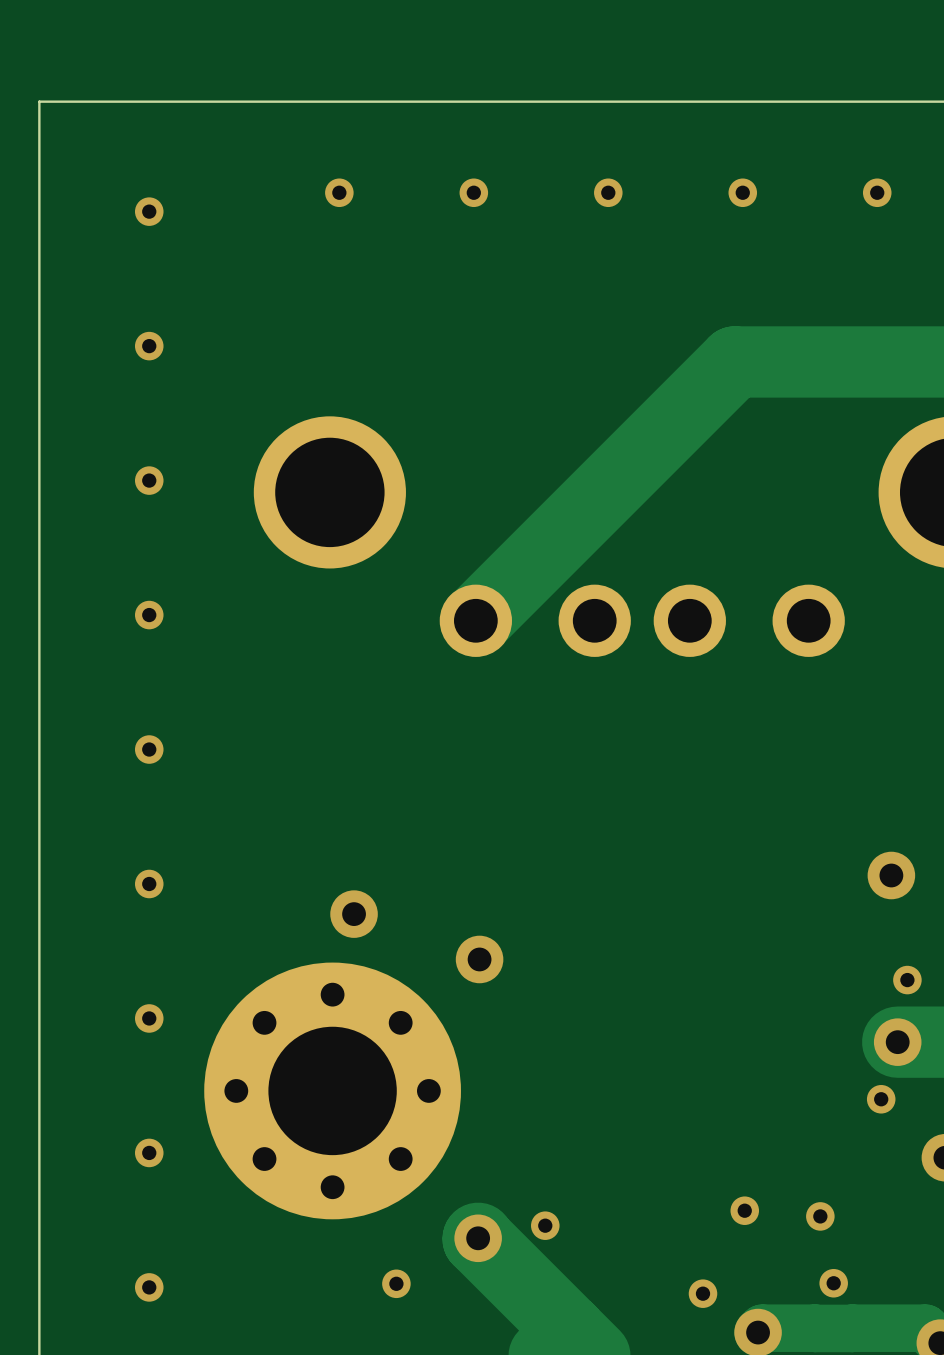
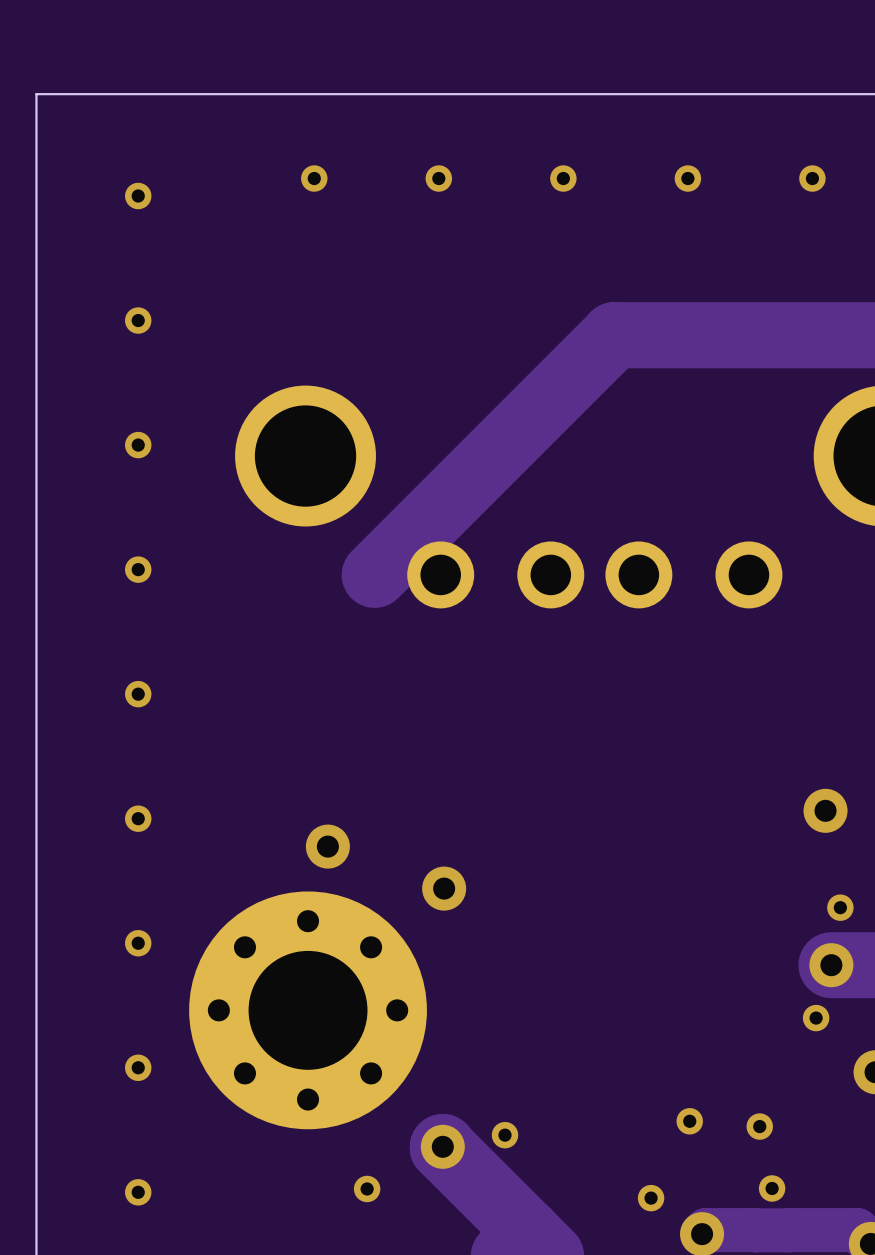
track: (734, 361) (475, 620) -> (680, 335) (614, 335) (374, 574)

